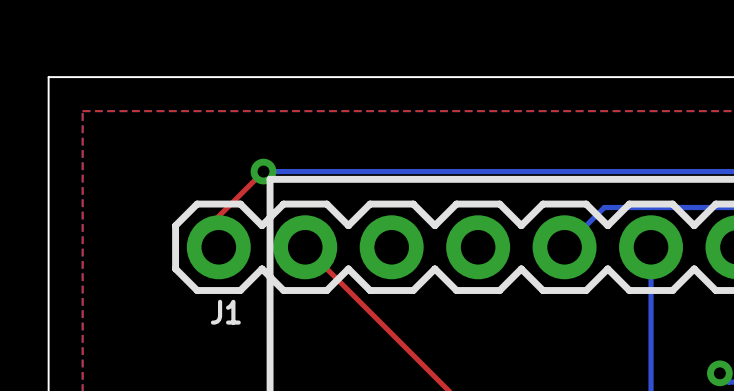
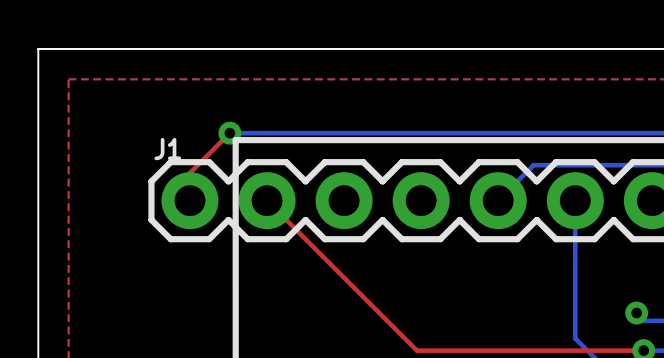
J1 name position: J1 (225, 312) -> J1 (167, 149)

